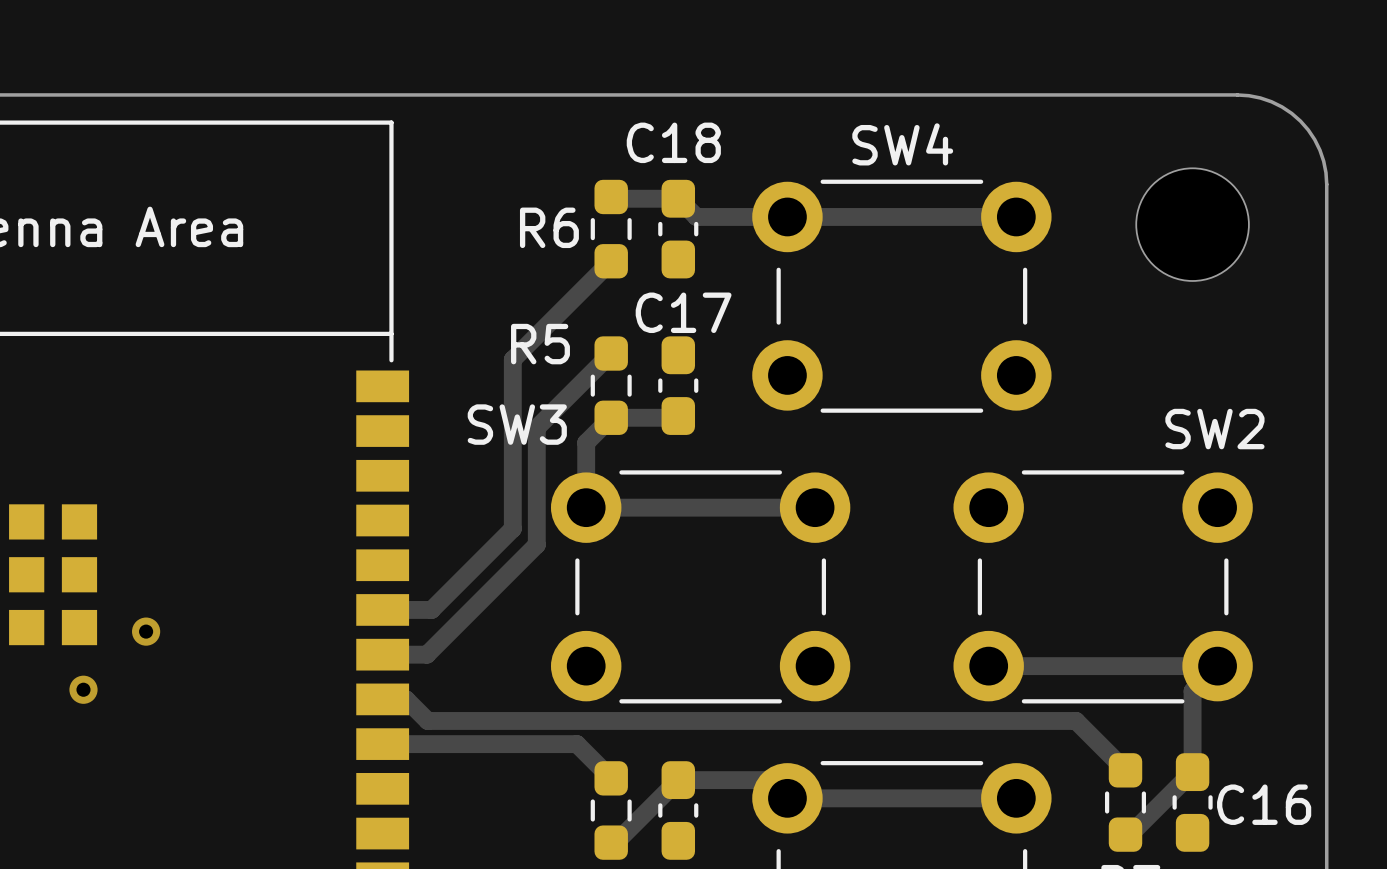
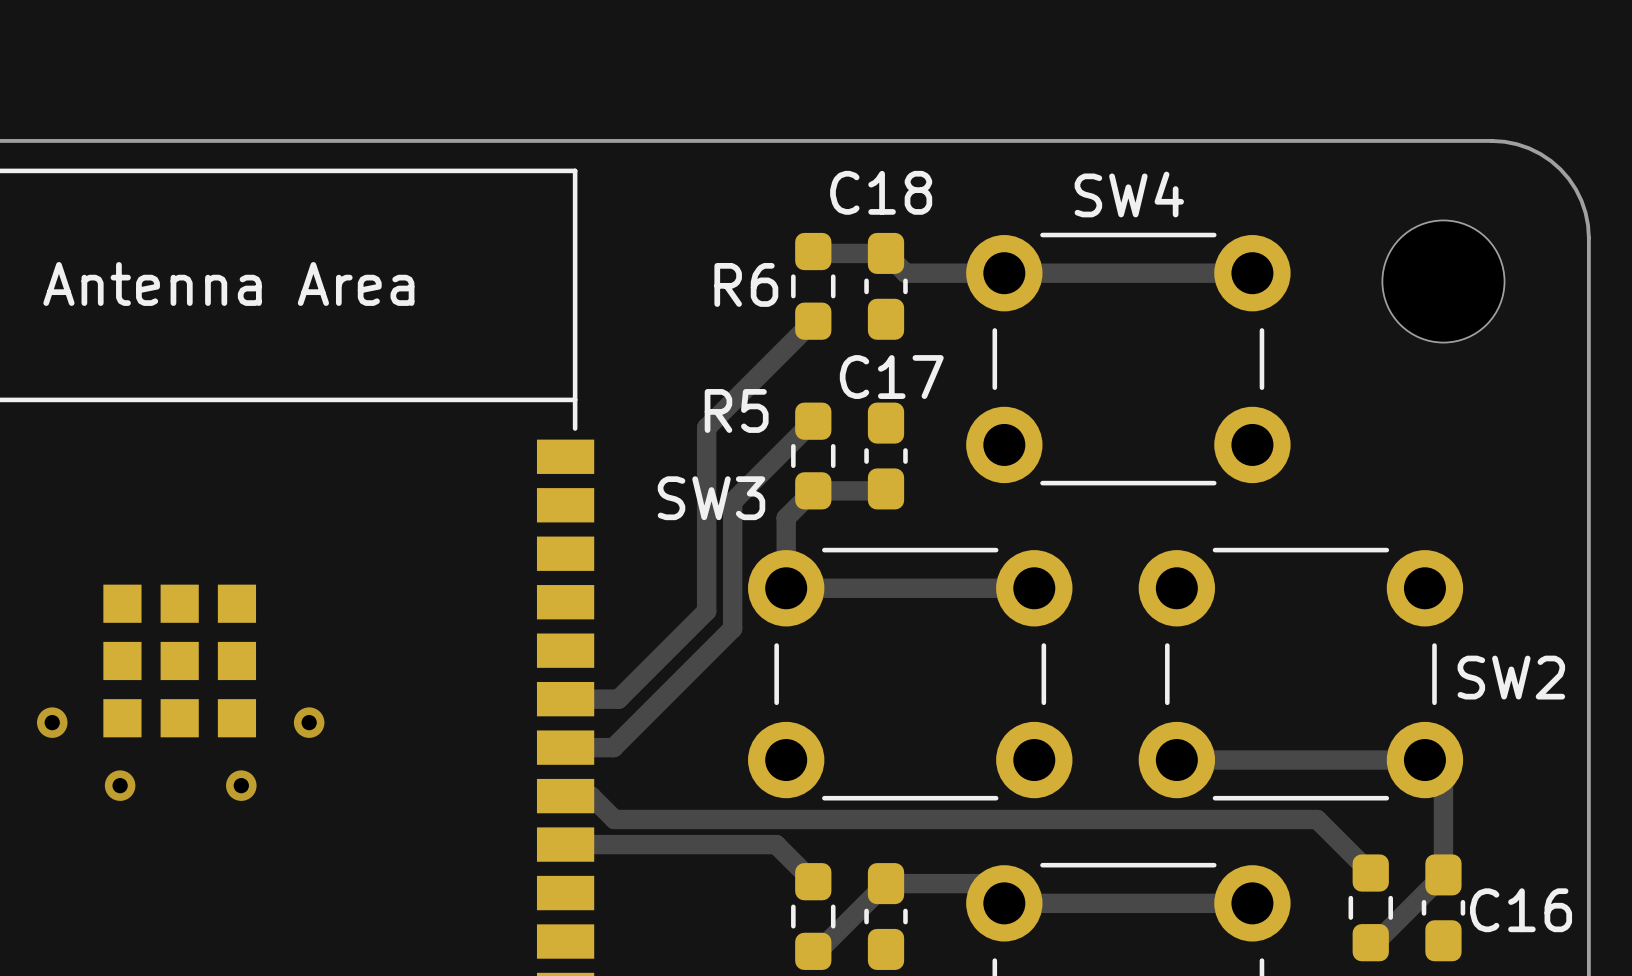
SW2 name position: SW2 (1214, 429) -> SW2 (1511, 677)
SW2 position: (1103, 586) -> (1300, 674)

